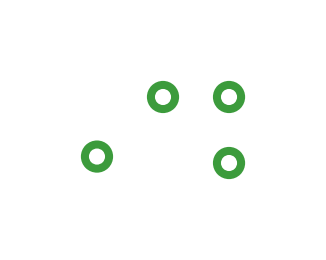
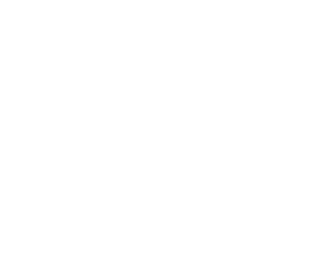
part: (163, 96) -> none
part: (229, 96) -> none
part: (96, 156) -> none
part: (229, 163) -> none

